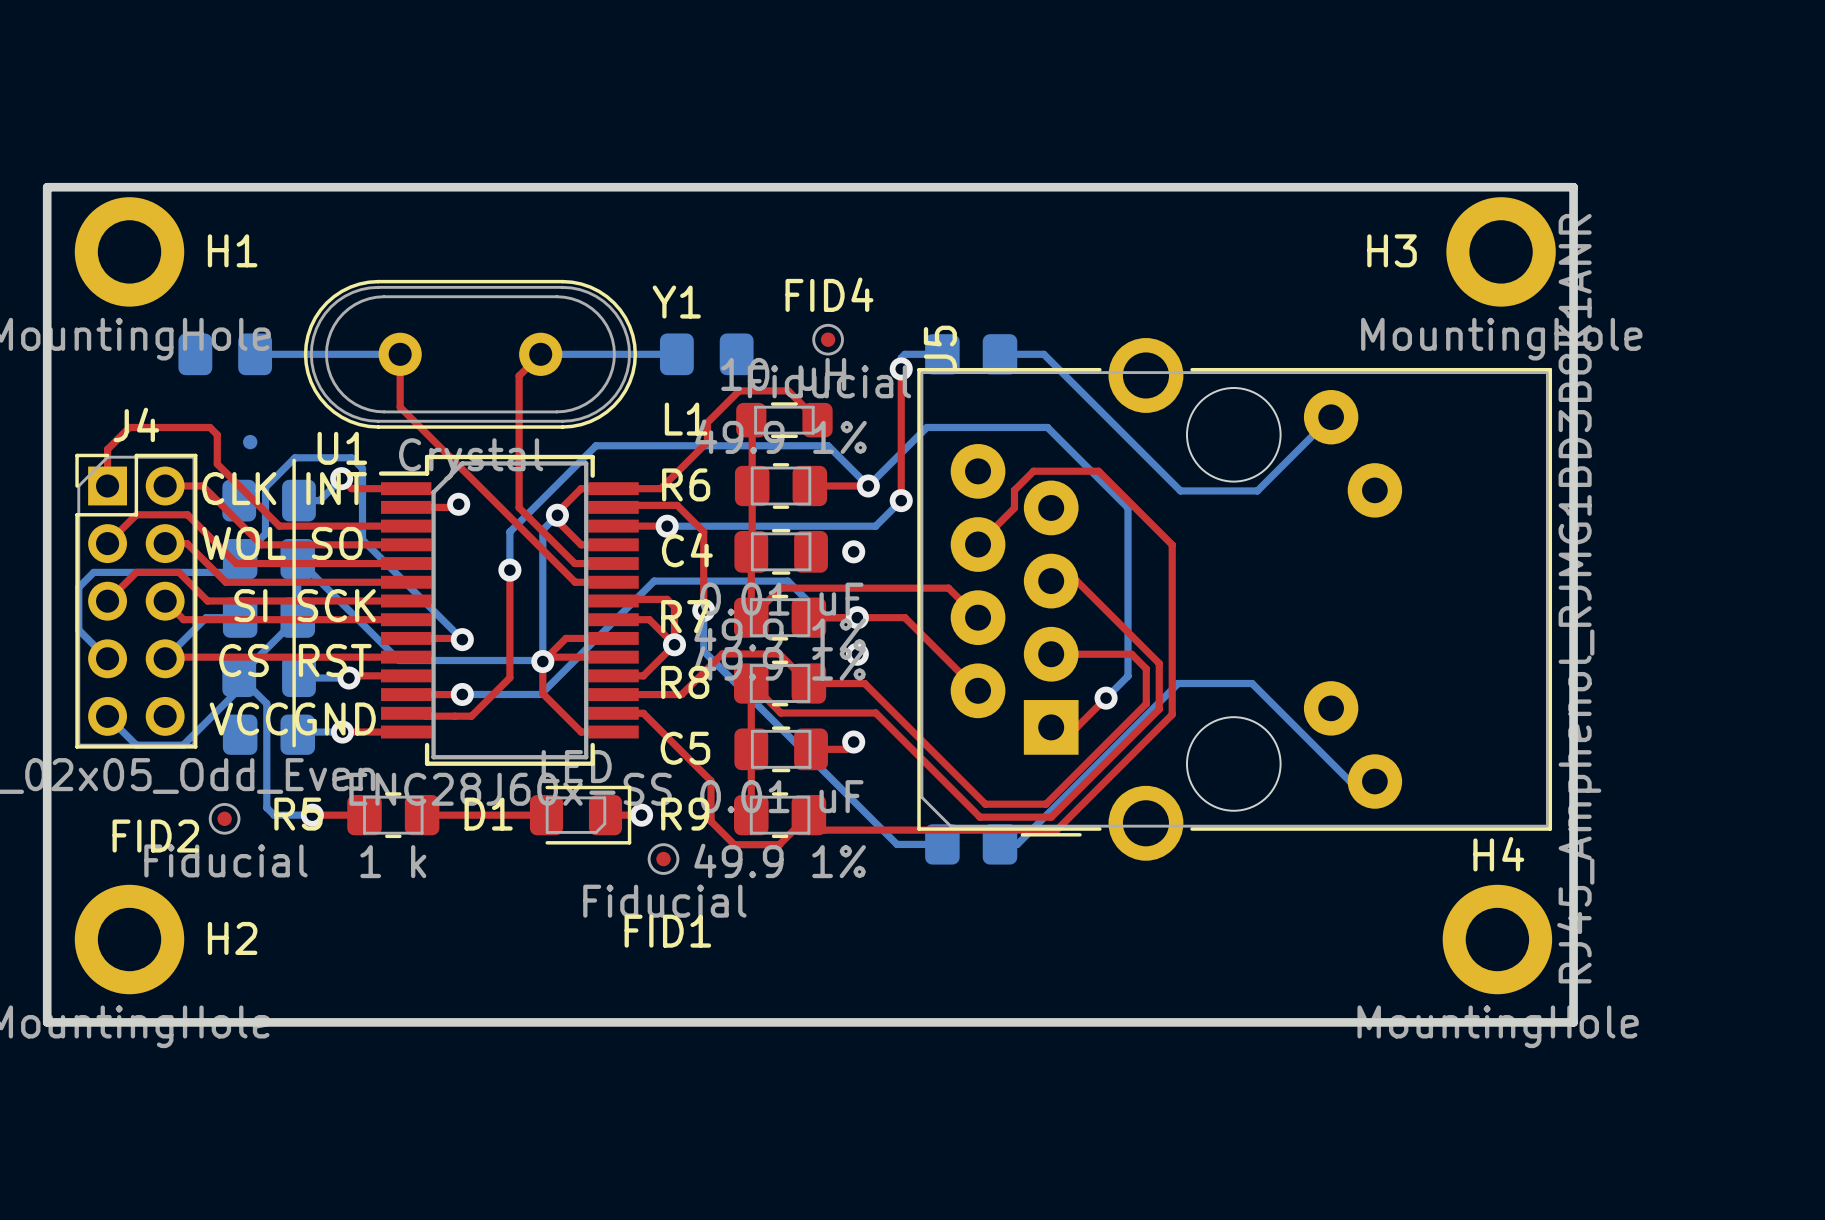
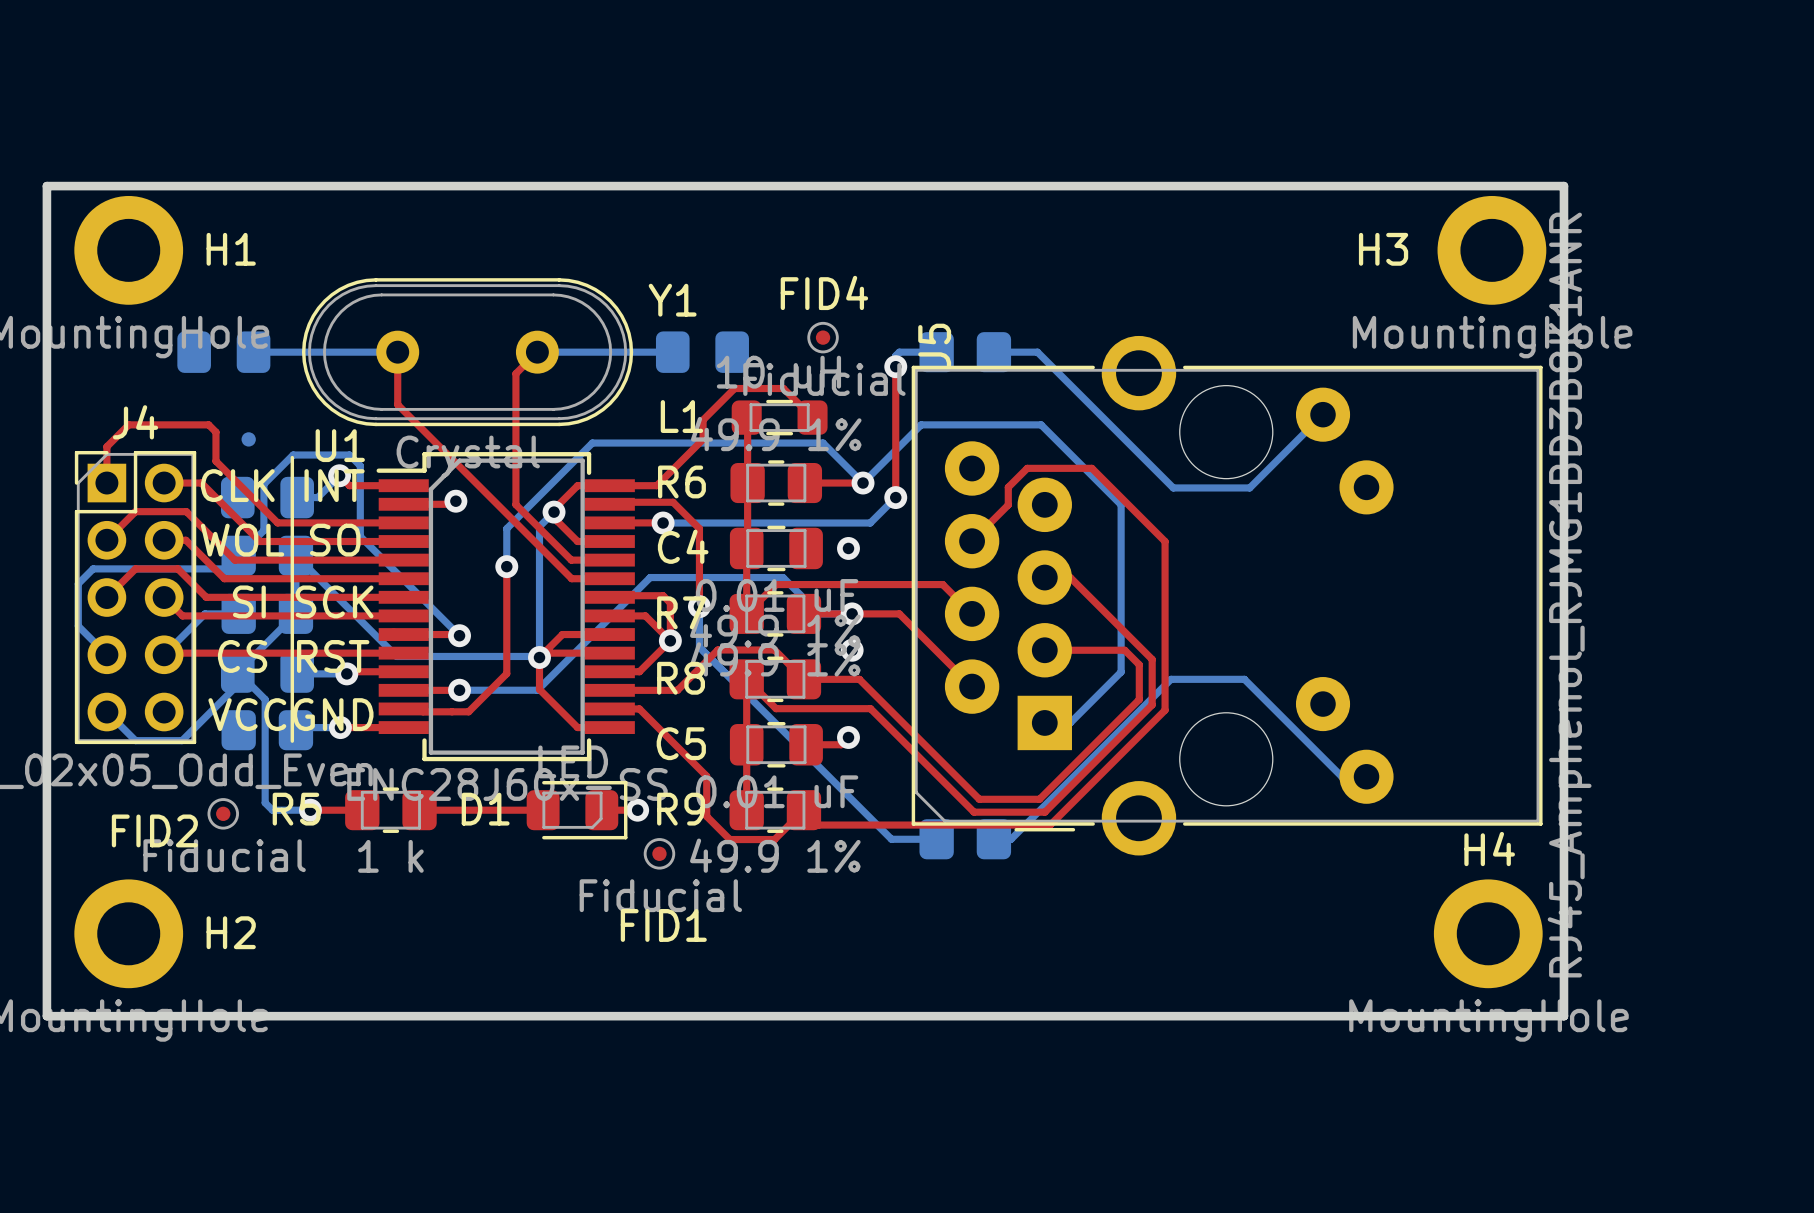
top track: (1106, 698) (1076, 727) (1051, 727) -> none
bottom track: none -> (1099, 693) (1070, 722) (1044, 722)
via: (1106, 698) -> none

